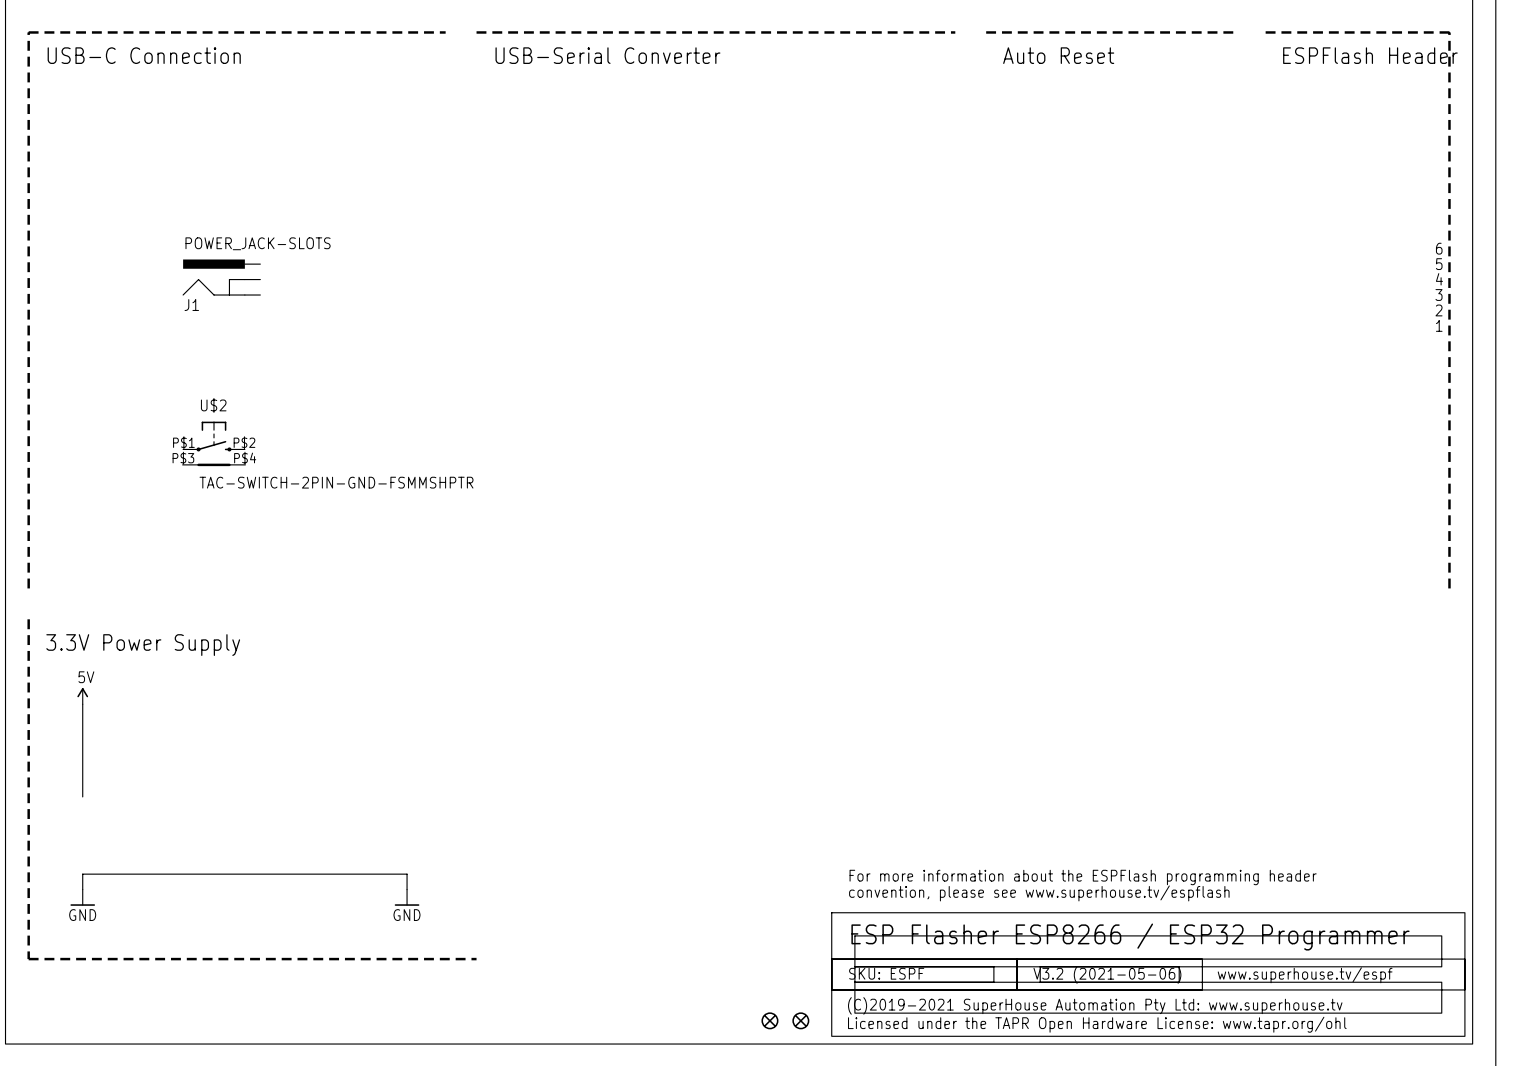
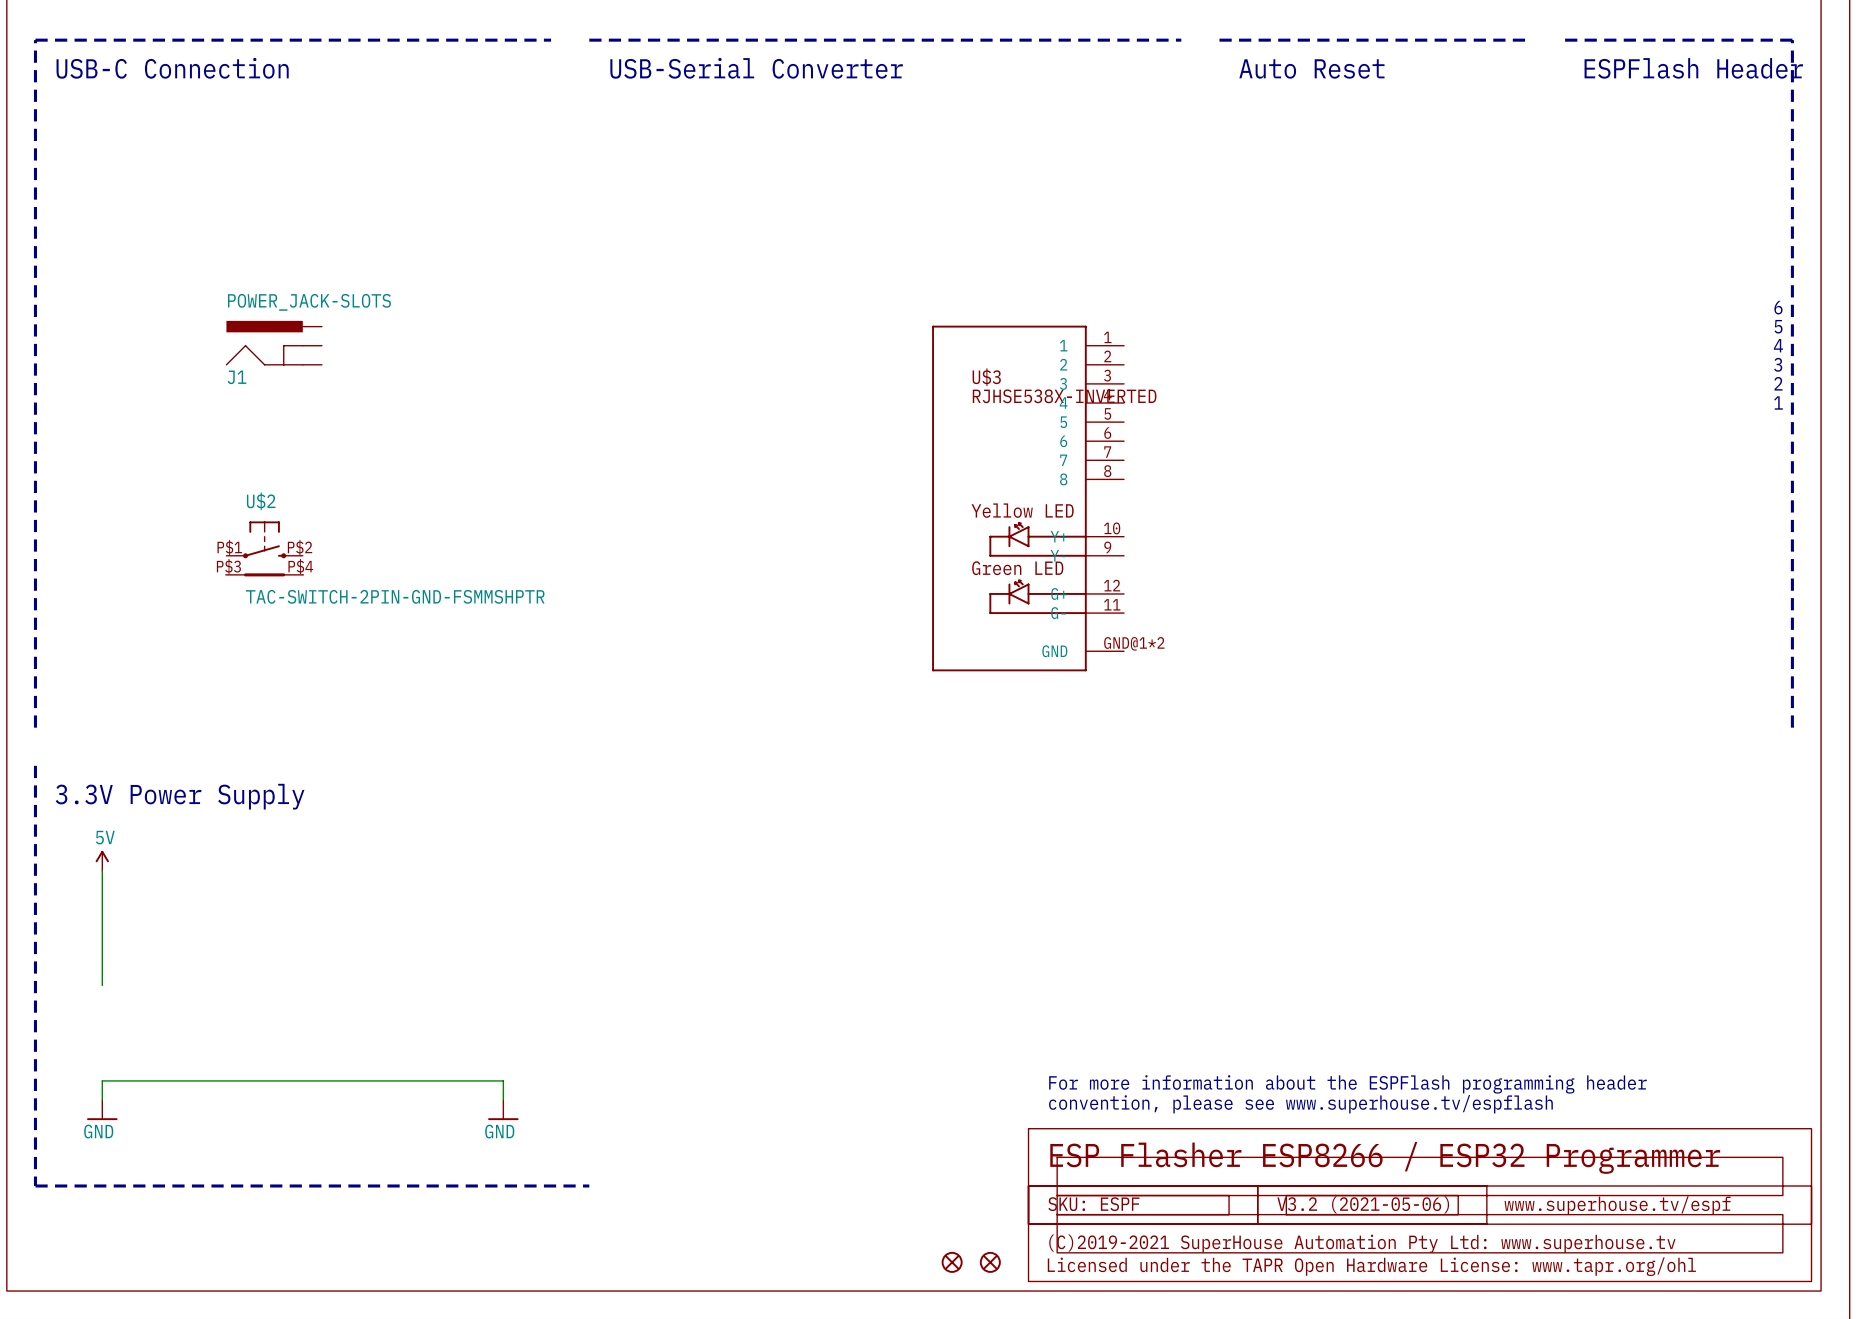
U$3: none -> RJHSE538X-INVERTED (1028, 498)

